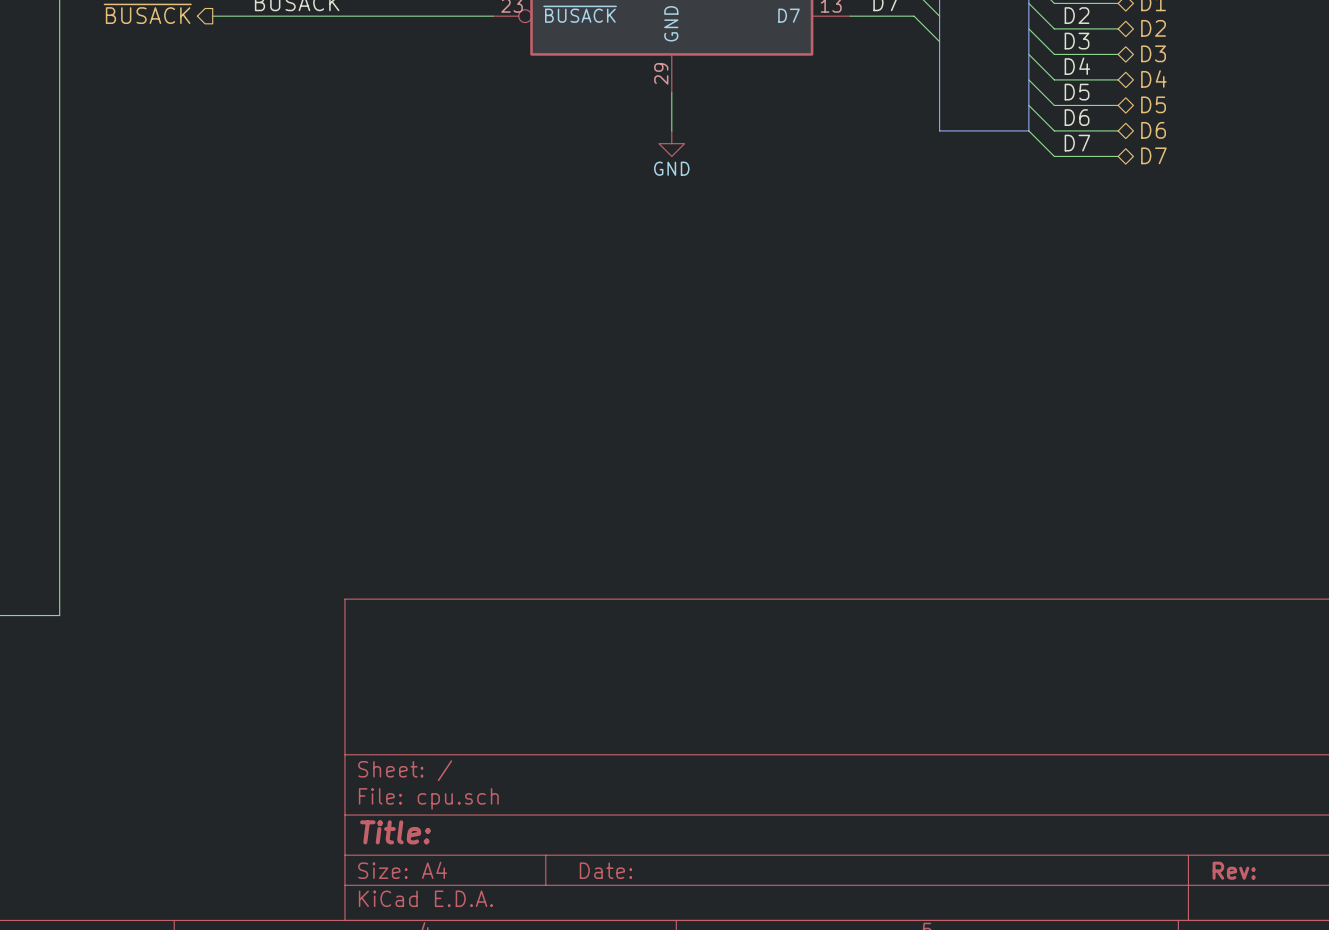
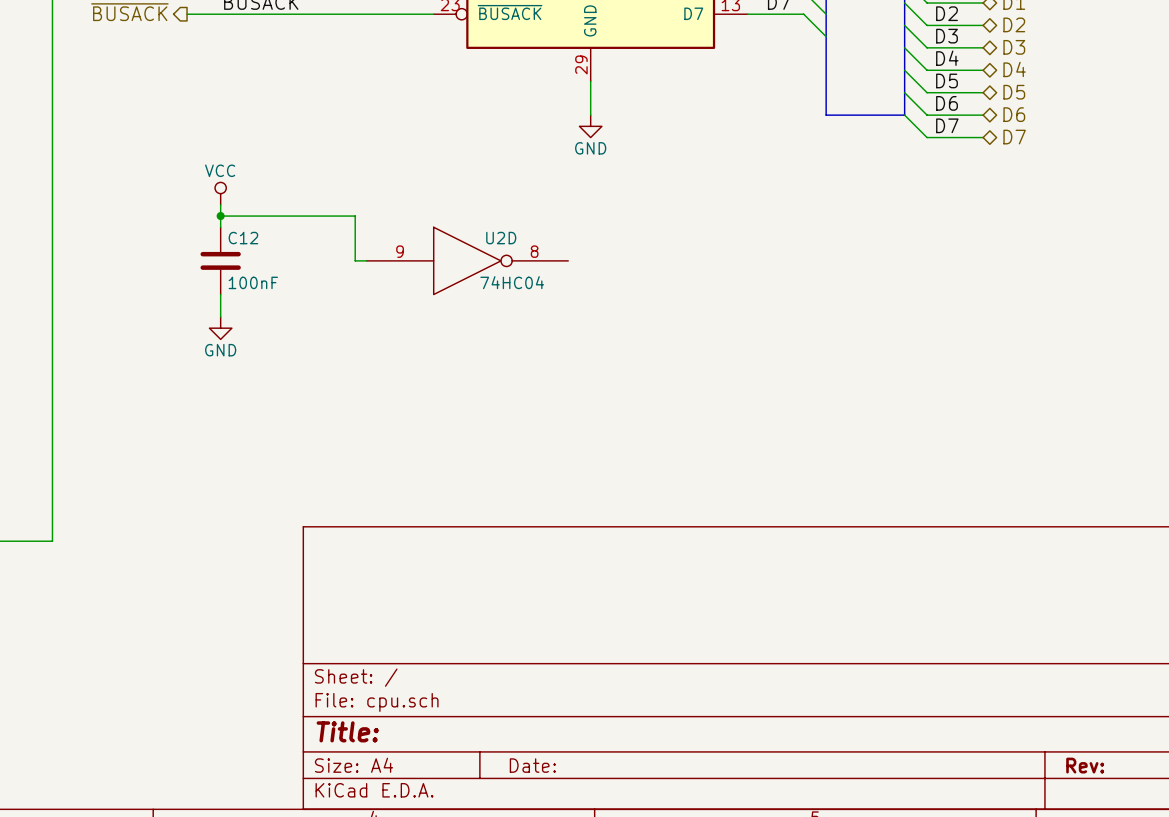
power symbol: none -> VCC (220, 193)
wire: none -> (220, 204) (220, 227)
wire: none -> (220, 216) (355, 216) (355, 260) (366, 260)
junction: none -> (220, 216)
C12: none -> 100nF (220, 260)
U2D: none -> 74HC04 (467, 260)
wire: none -> (220, 294) (220, 316)
power symbol: none -> GND (220, 328)

